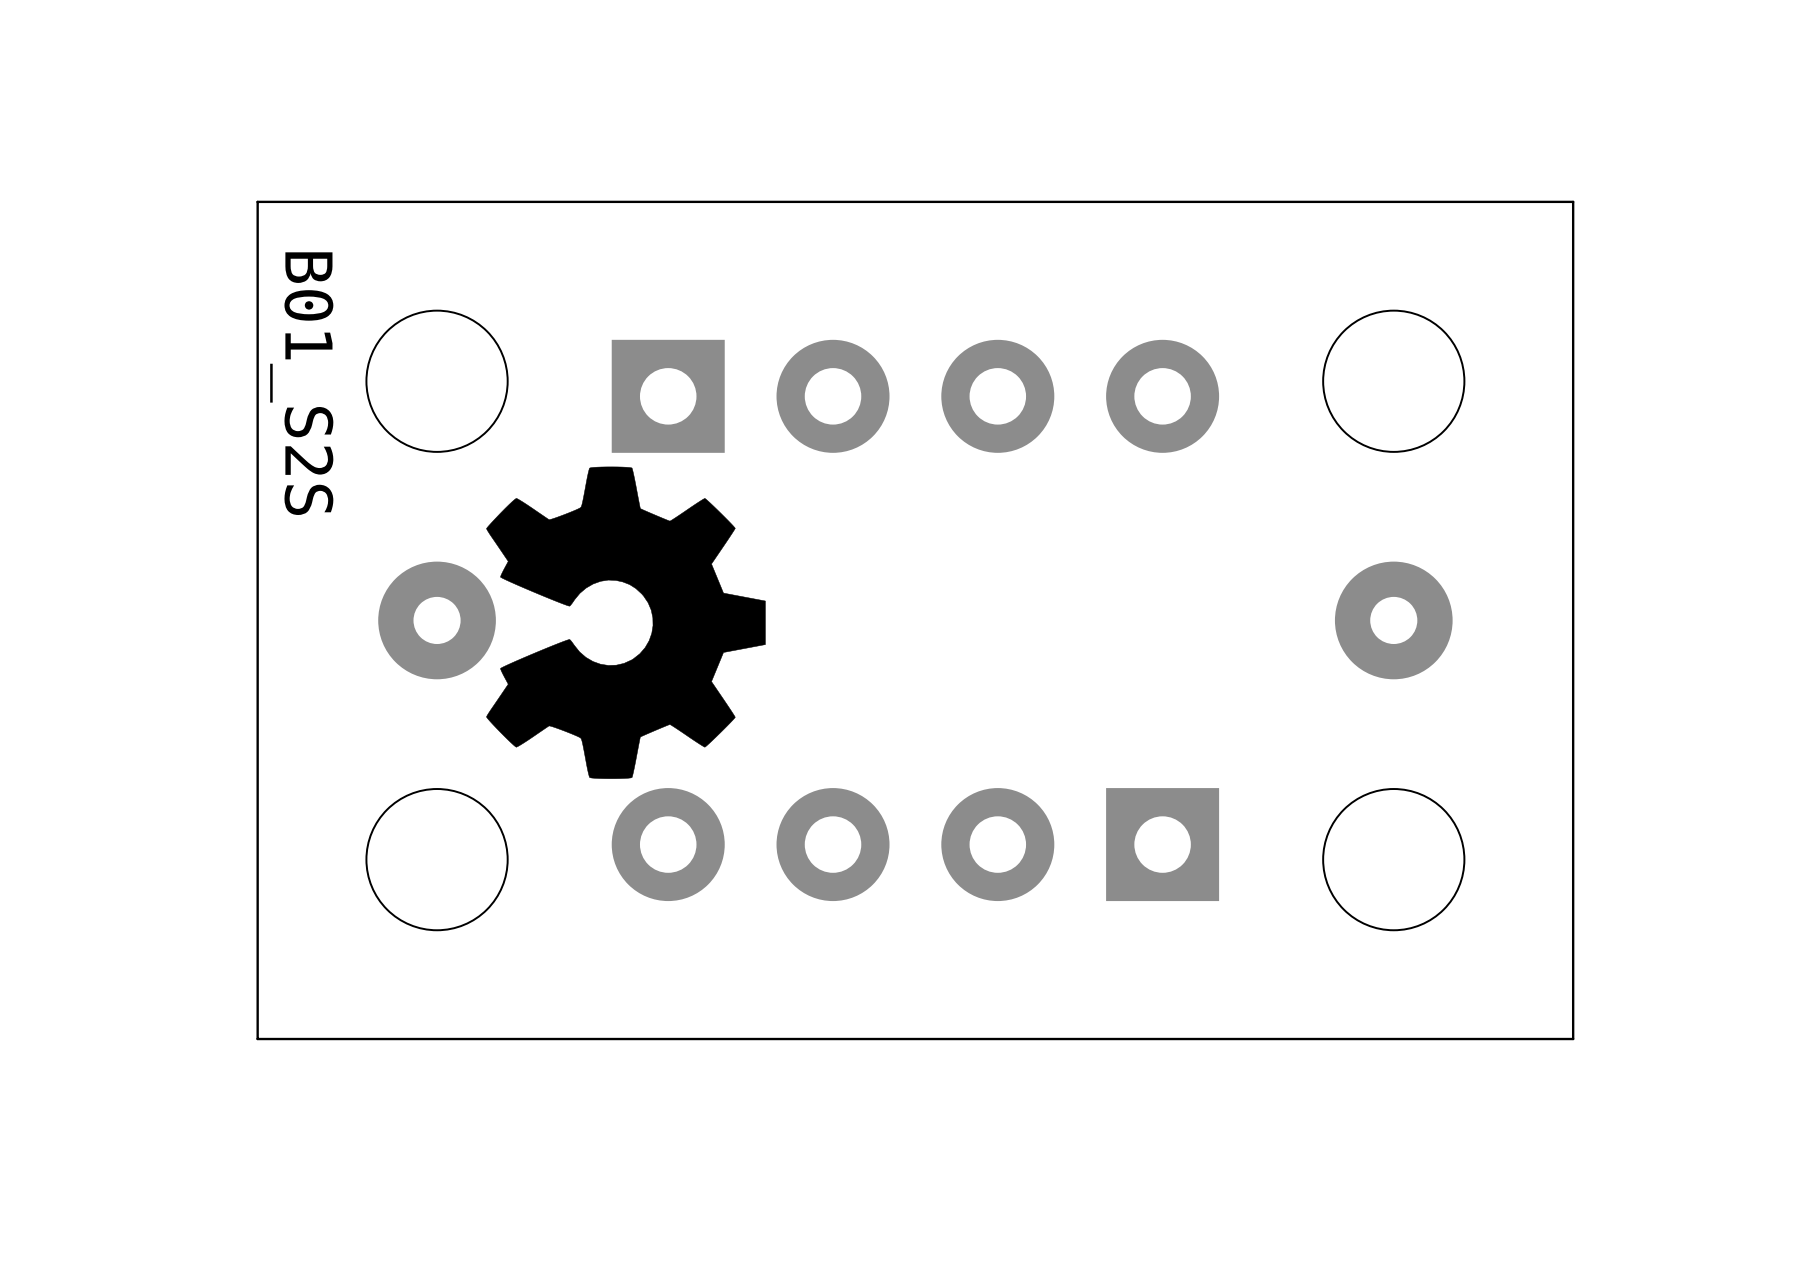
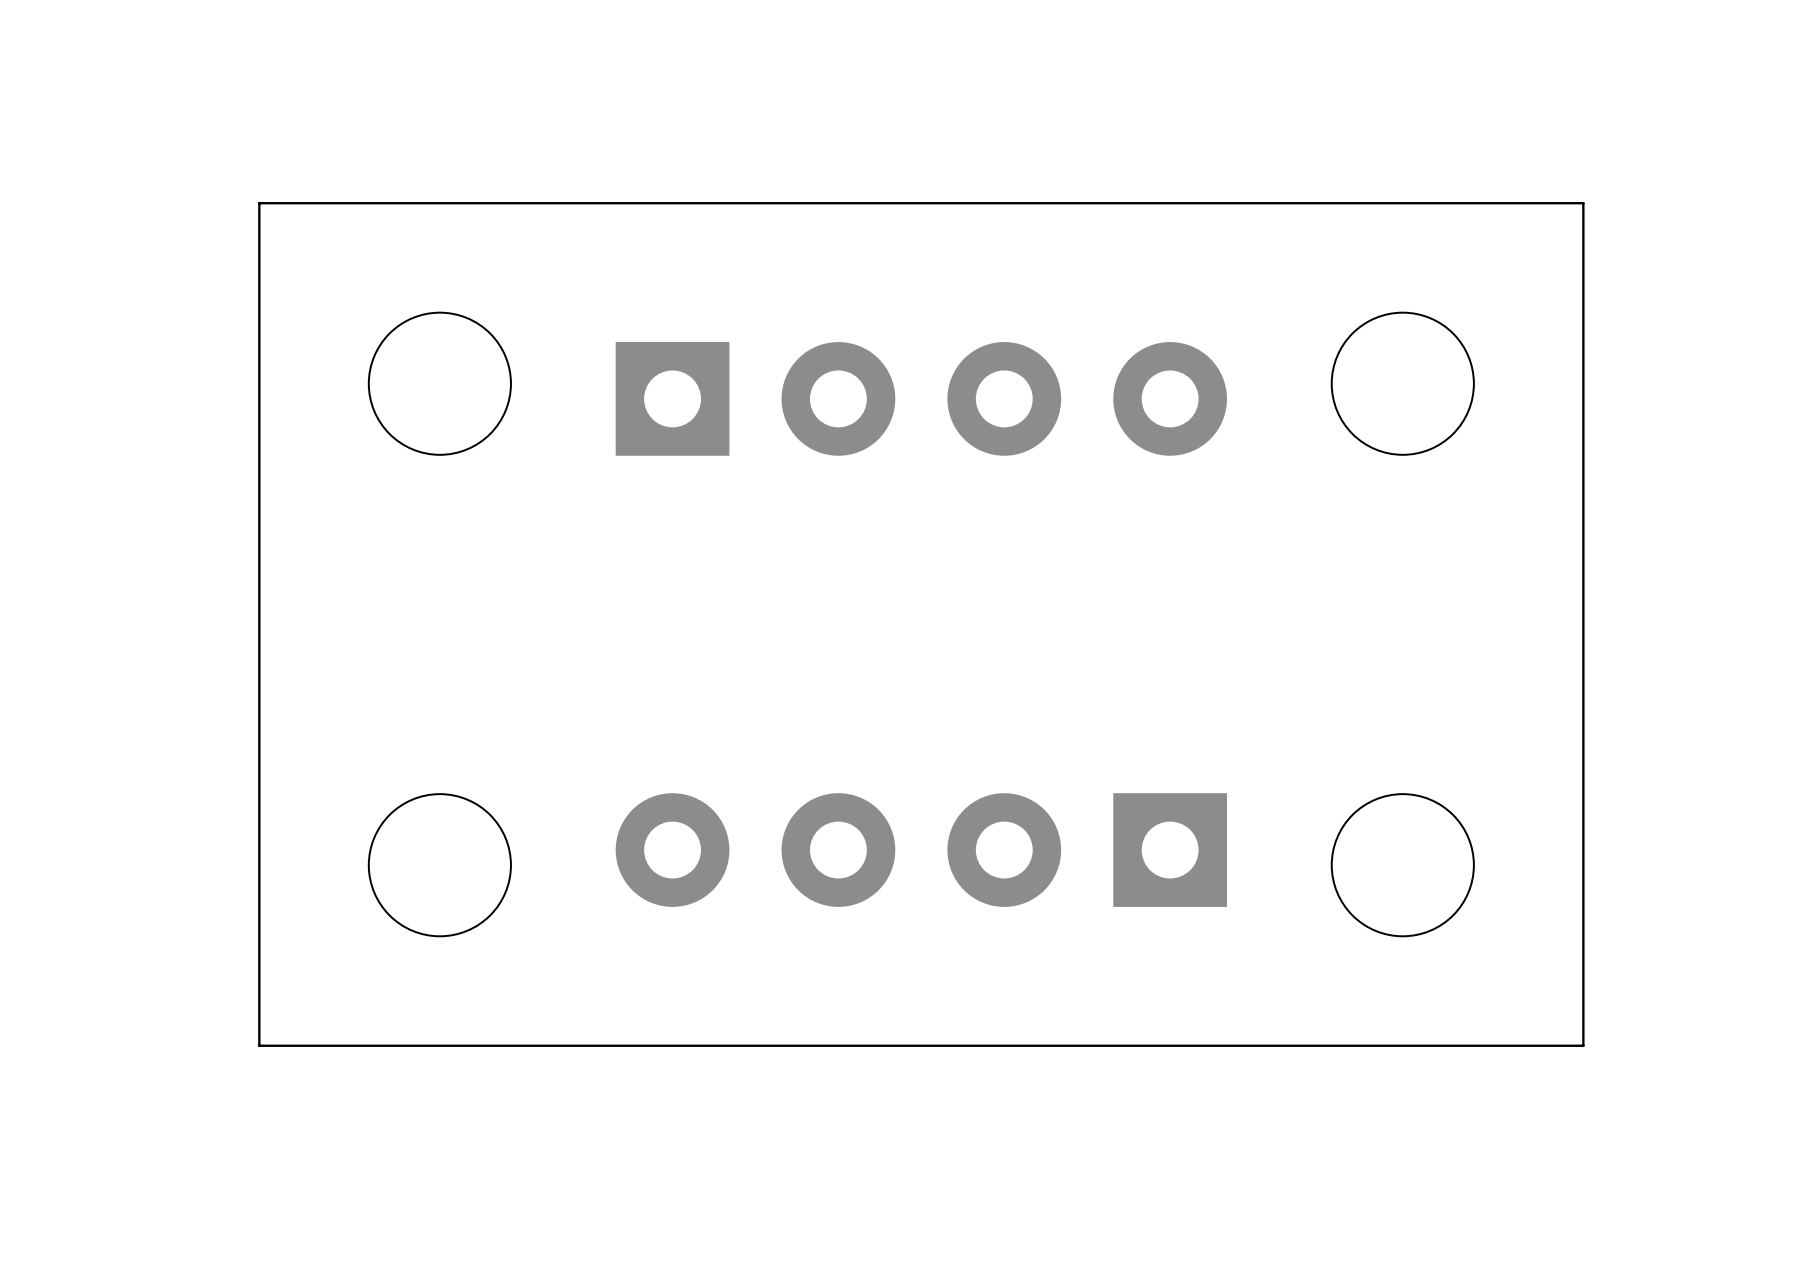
text: B01_S2S (301, 383) -> none
drawing: [486, 466, 766, 779] -> none
part: (437, 620) -> none
part: (1393, 620) -> none

